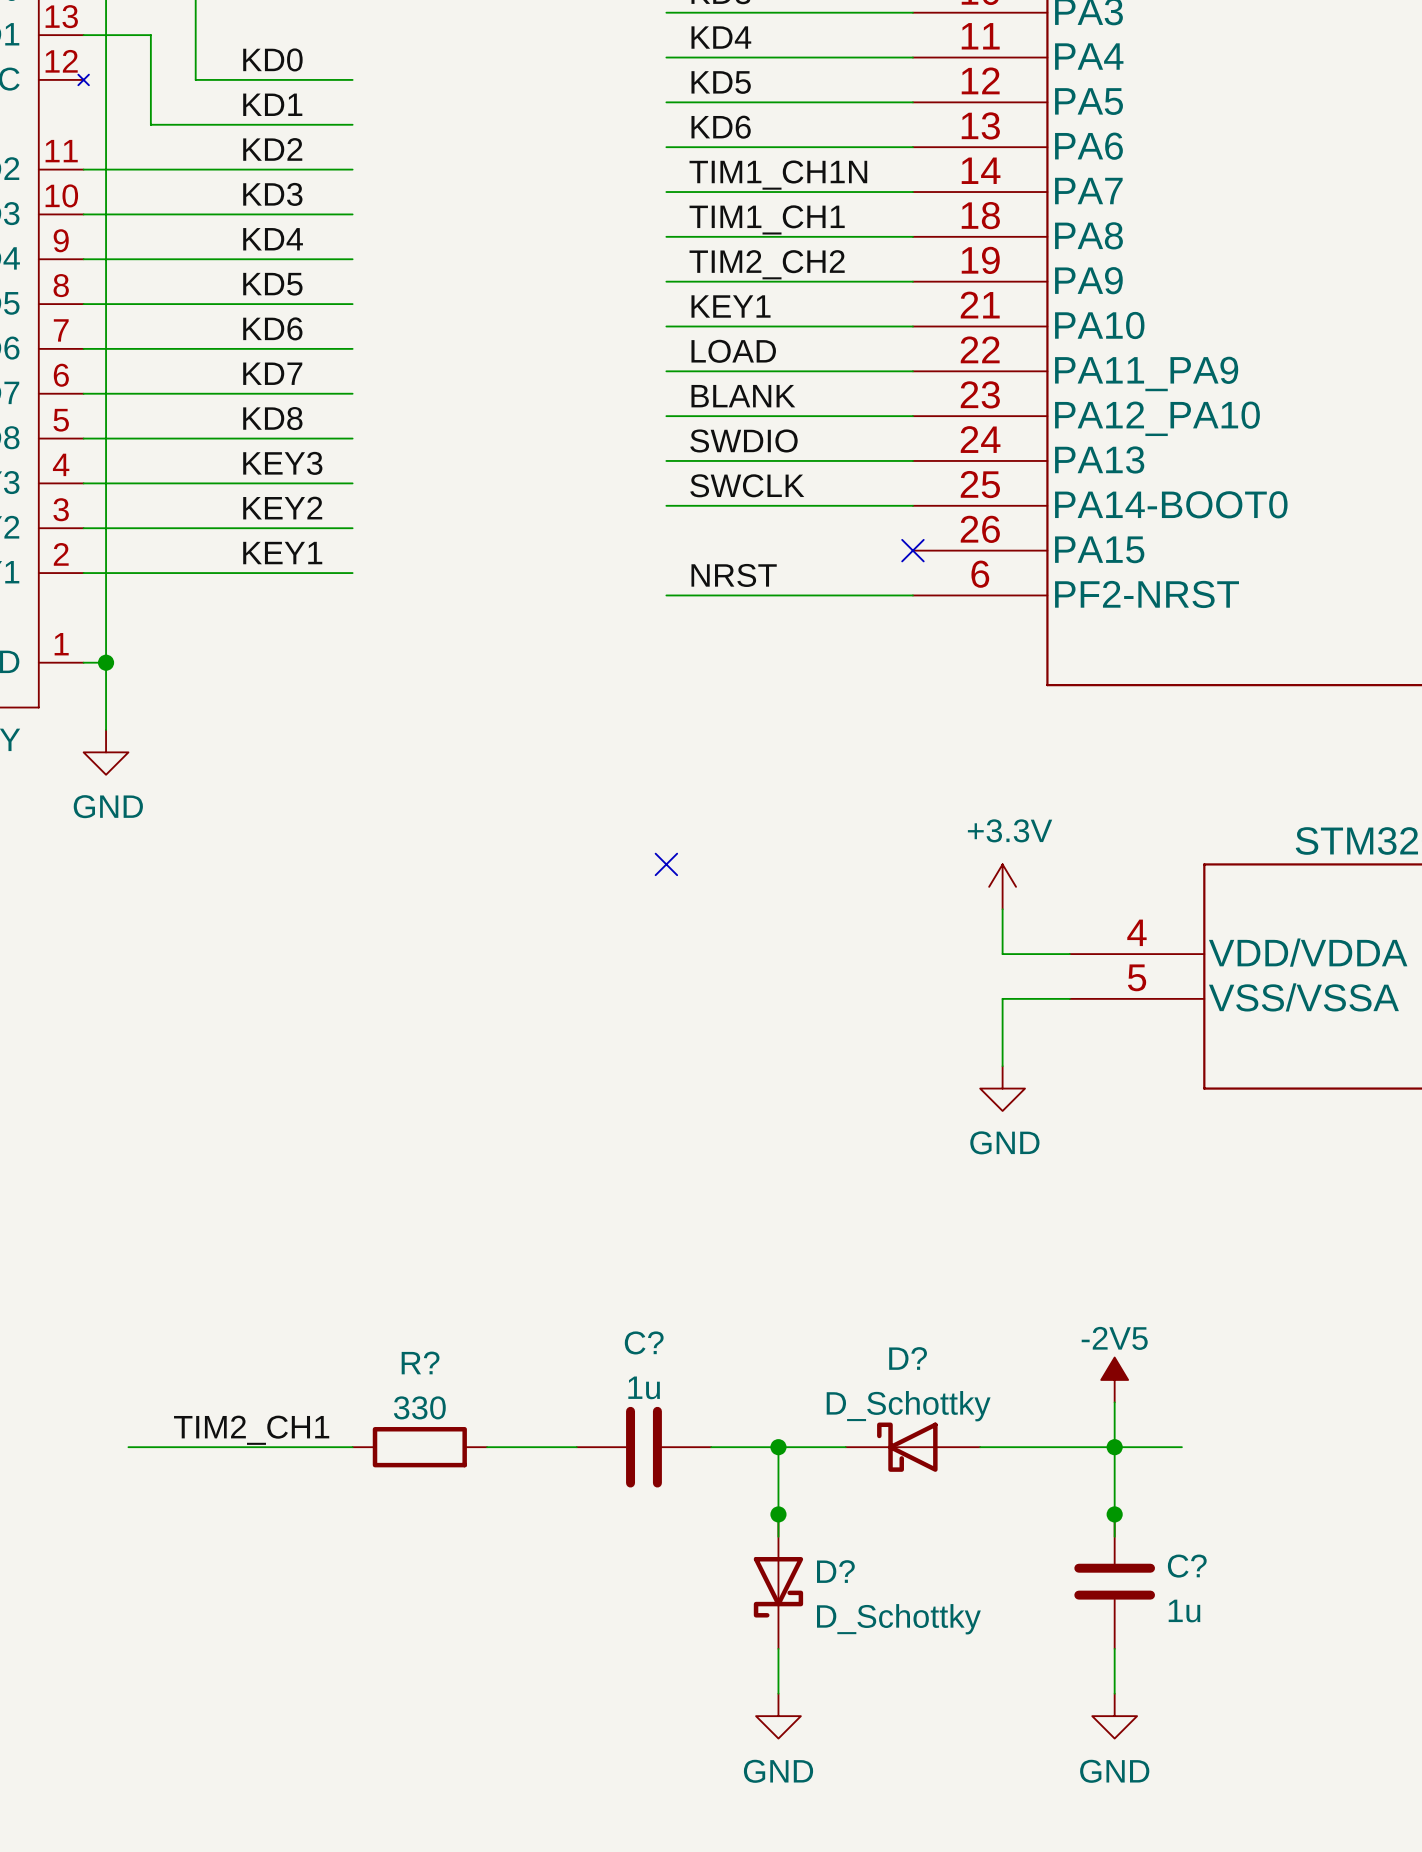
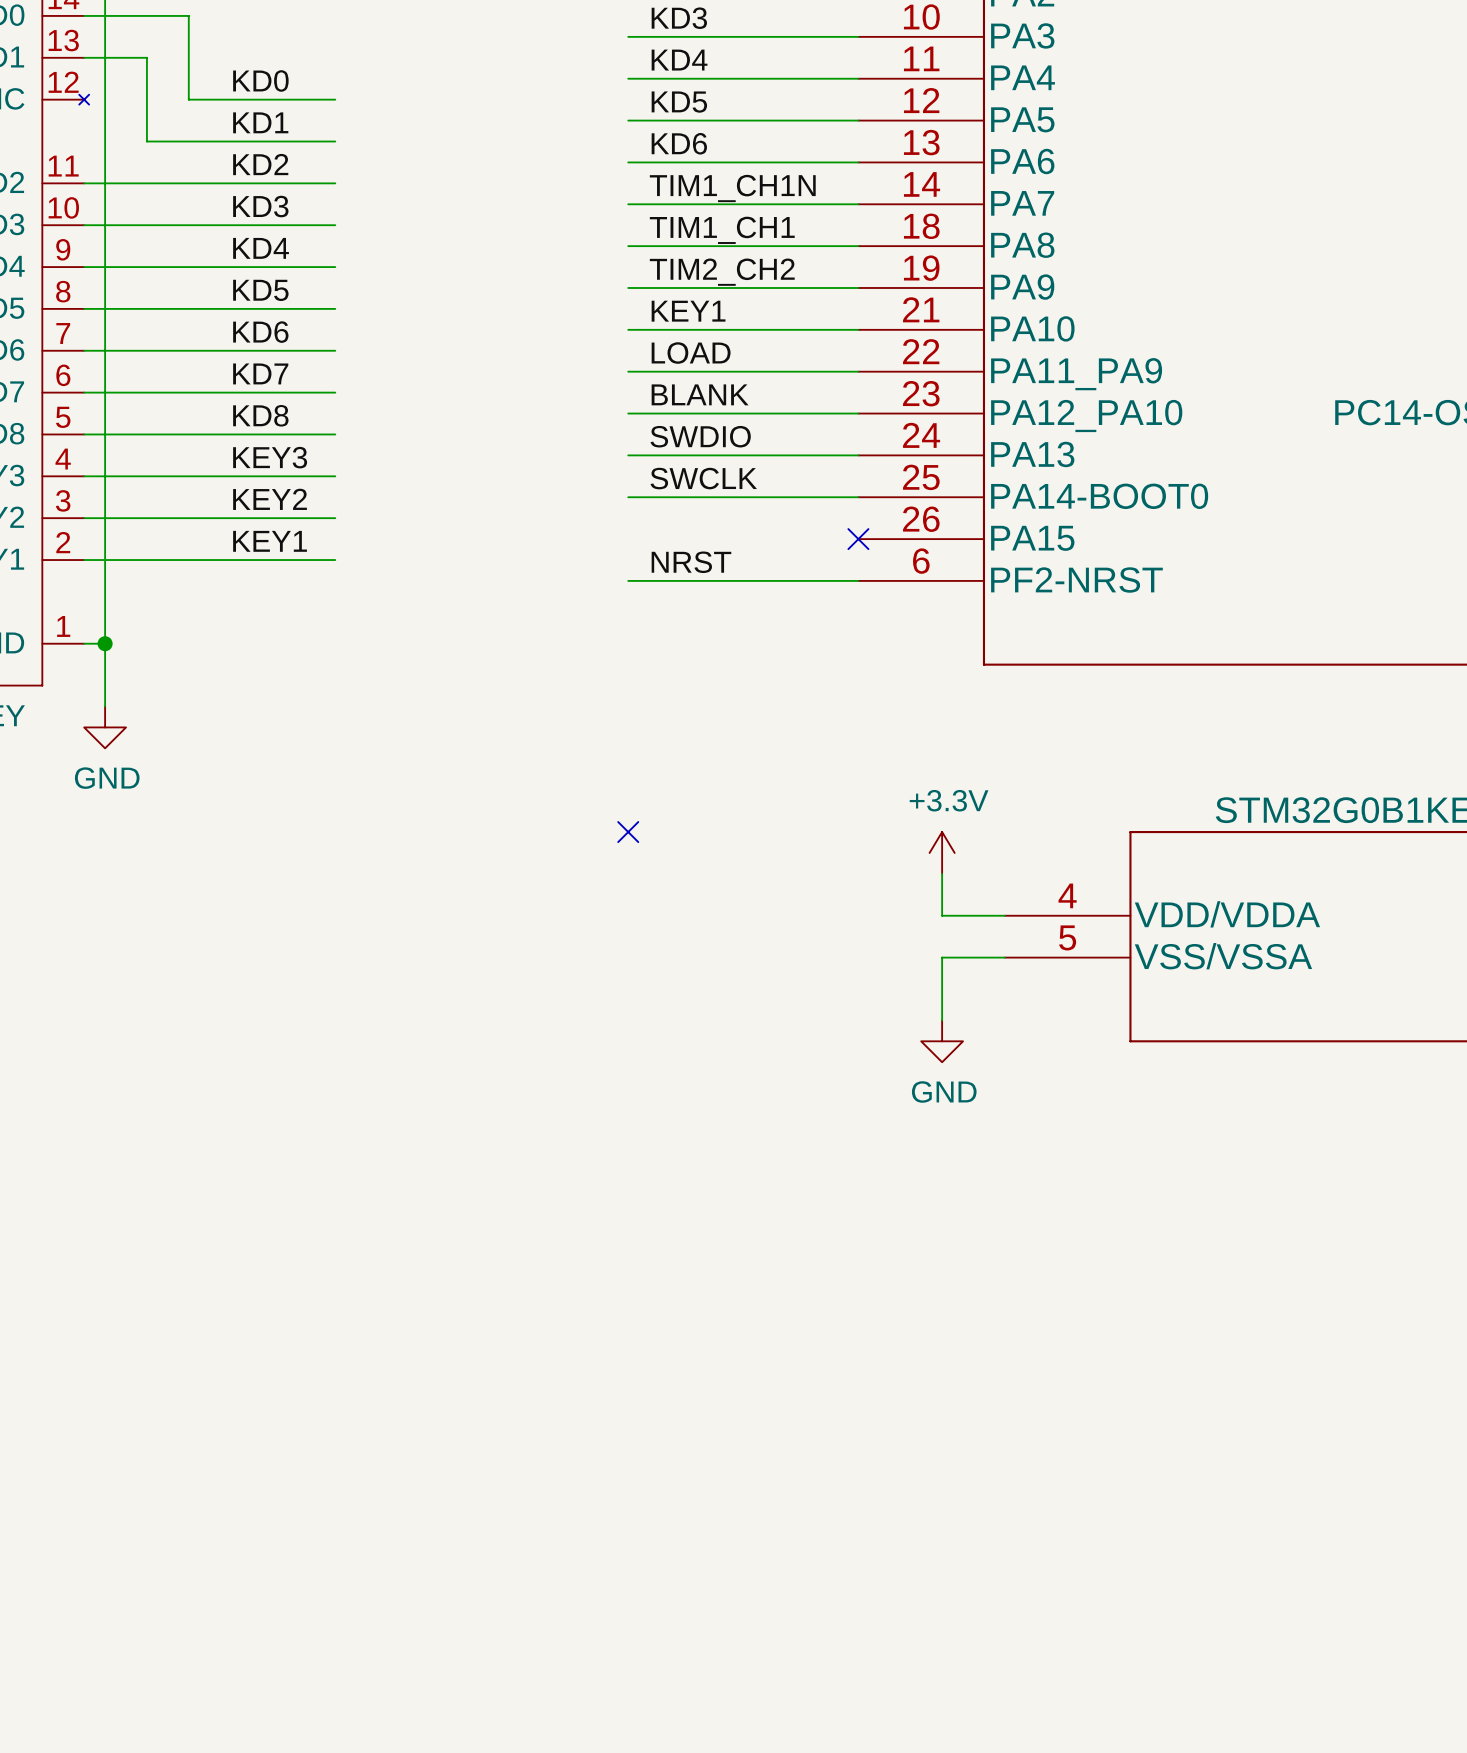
power symbol: -2V5 (1114, 1379) -> none
wire: (1114, 1402) (1114, 1536) -> none
label: TIM2_CH1 (251, 1430) -> none
wire: (128, 1447) (352, 1447) -> none
R?: 330 (419, 1447) -> none
wire: (487, 1447) (576, 1447) -> none
C?: 1u (643, 1447) -> none
wire: (711, 1447) (845, 1447) -> none
wire: (778, 1447) (778, 1536) -> none
junction: (778, 1447) -> none
D?: D_Schottky (912, 1447) -> none
wire: (980, 1447) (1181, 1447) -> none
junction: (1114, 1447) -> none
junction: (778, 1514) -> none
junction: (1114, 1514) -> none
D?: D_Schottky (778, 1581) -> none
C?: 1u (1114, 1581) -> none
wire: (778, 1648) (778, 1693) -> none
wire: (1114, 1648) (1114, 1693) -> none
power symbol: GND (778, 1716) -> none
power symbol: GND (1114, 1716) -> none

